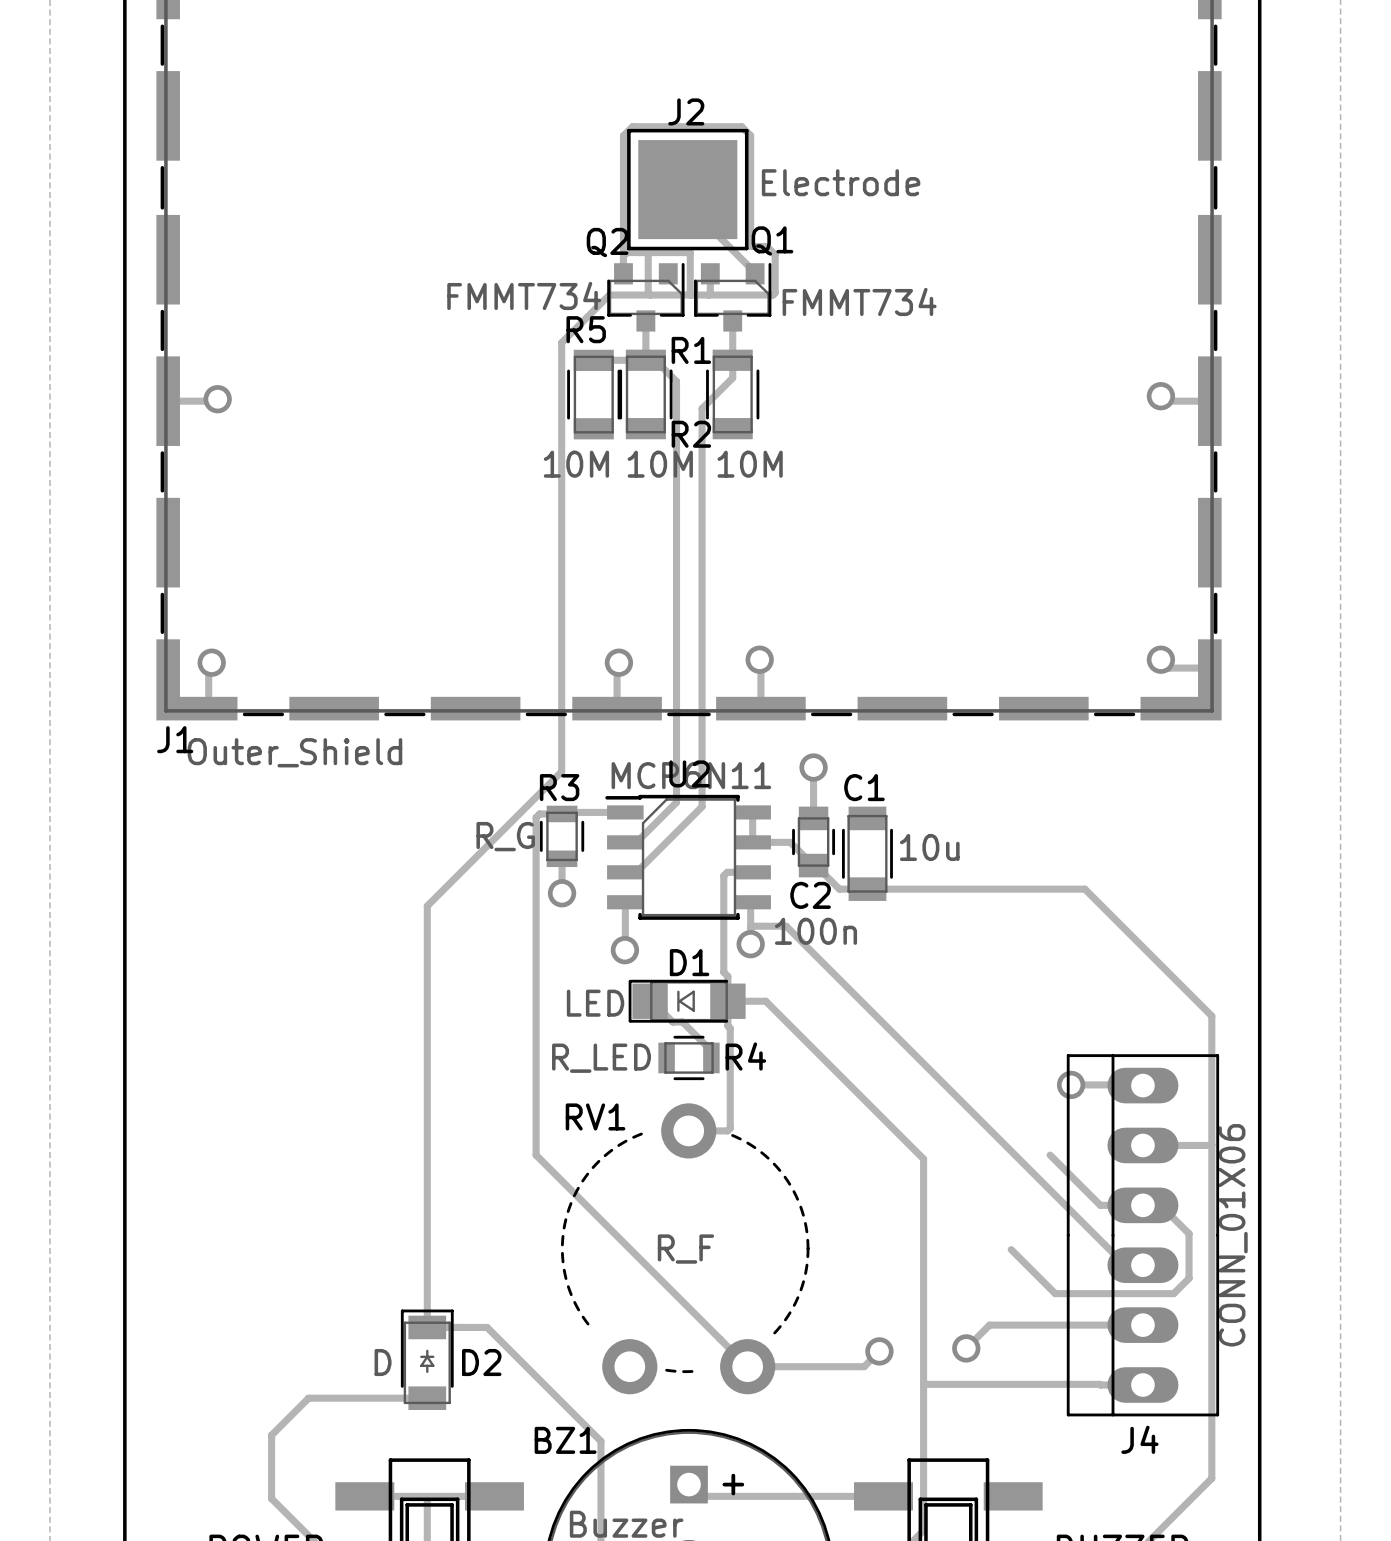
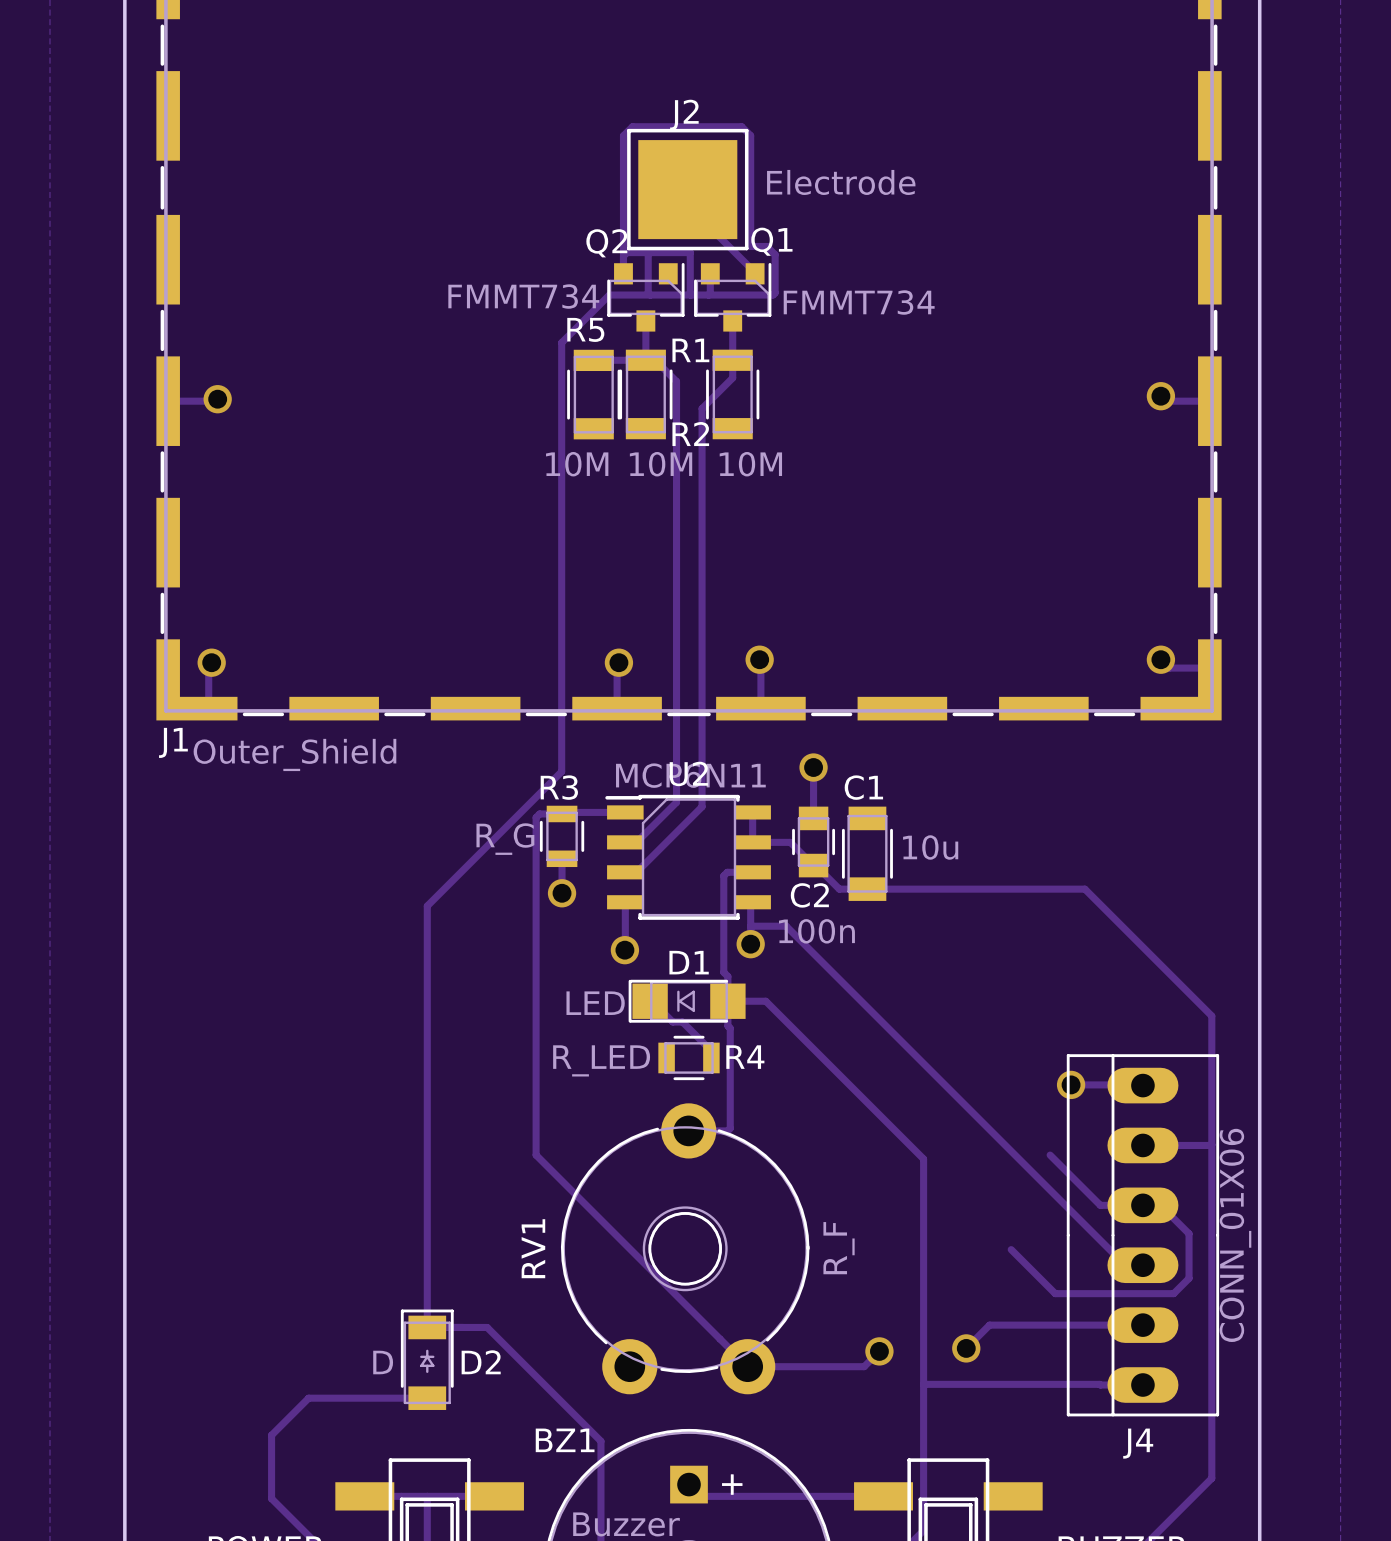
RV1 footprint: [560, 1103, 810, 1395] -> [560, 1103, 810, 1395]
RV1 name position: RV1 (595, 1116) -> RV1 (533, 1248)
RV1 value position: R_F (685, 1249) -> R_F (839, 1248)

